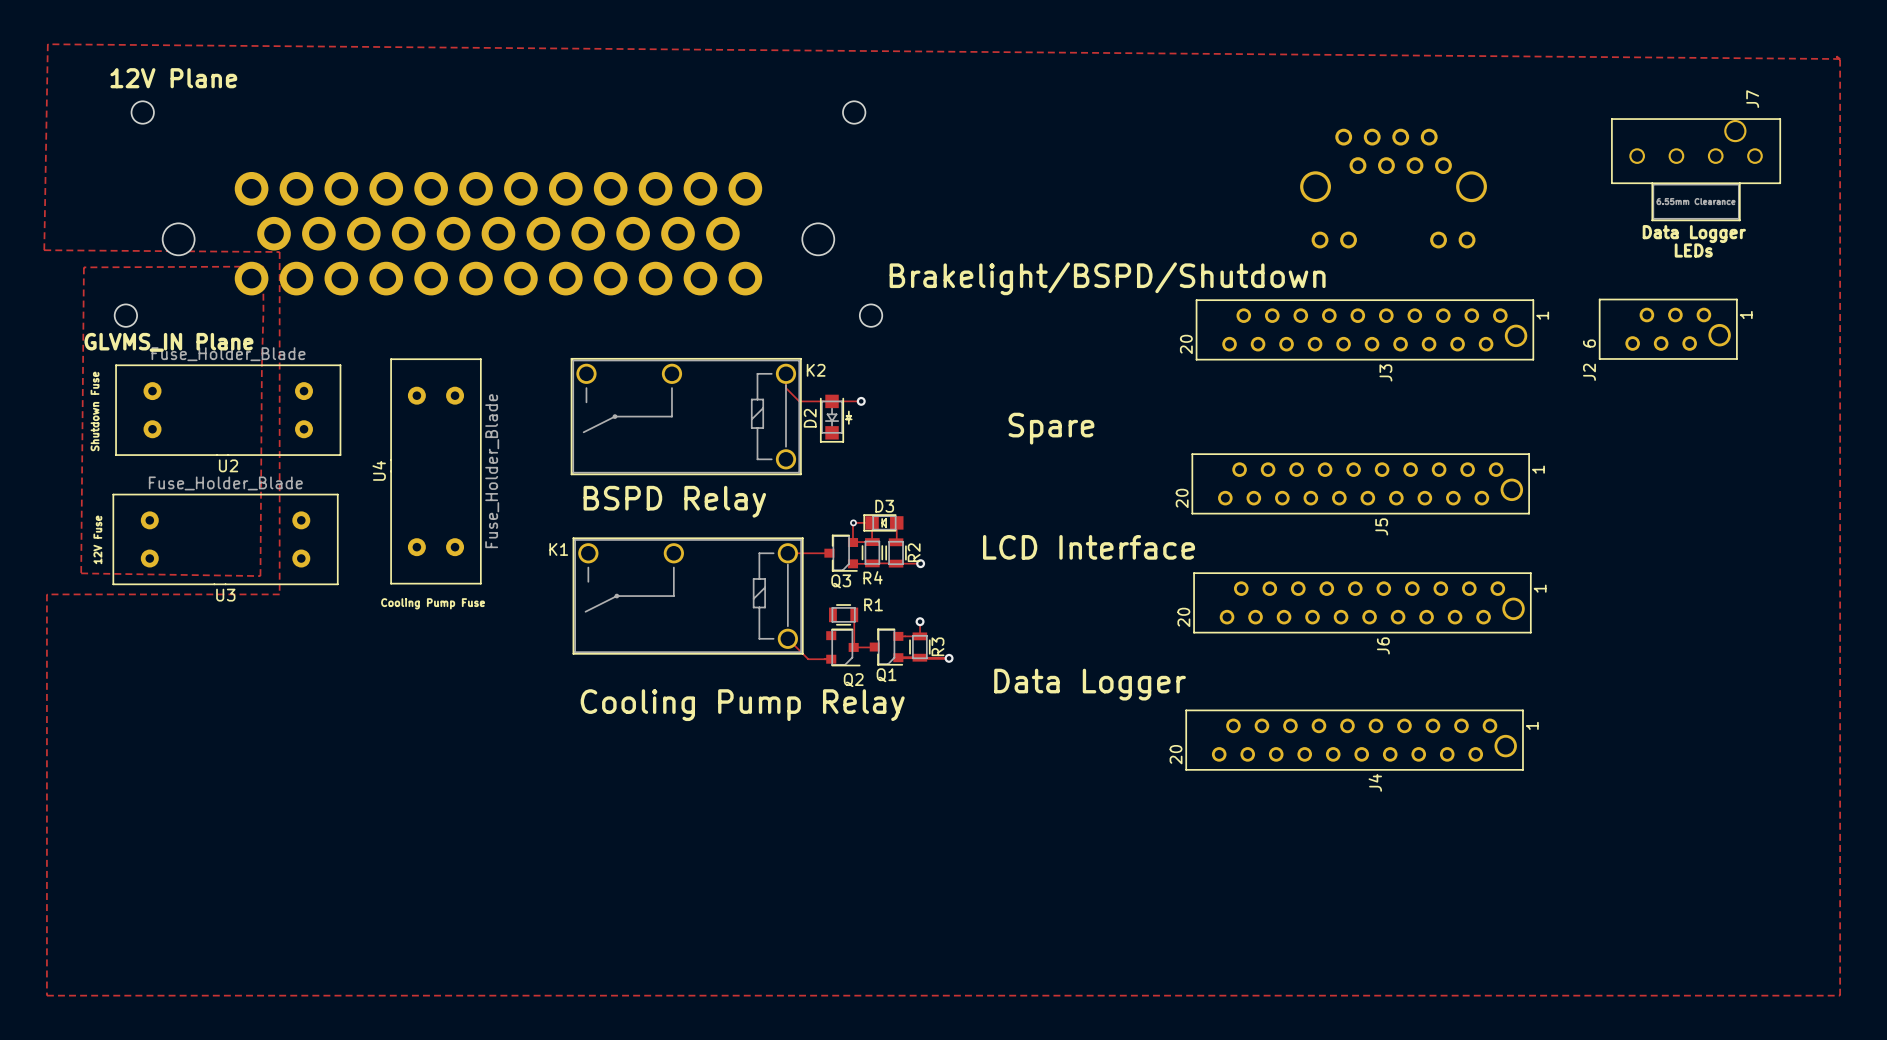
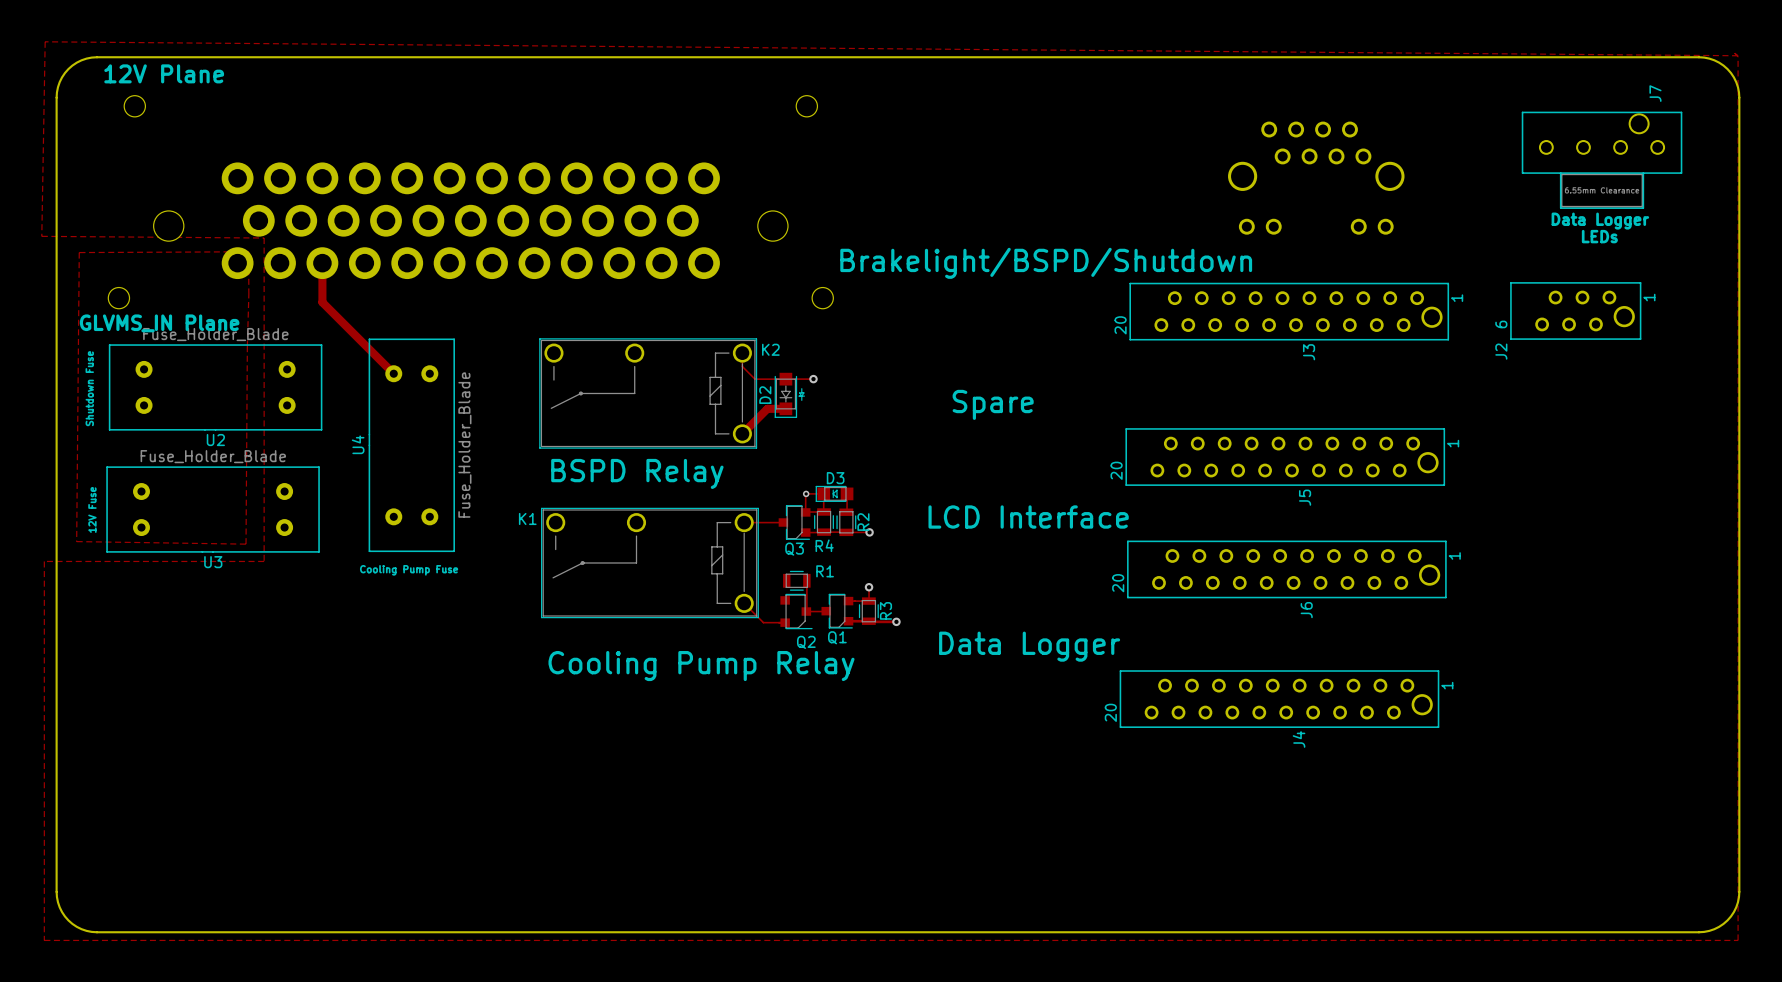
board edge: none -> (97, 57) (1698, 57) (1719, 62) (1733, 77) (1739, 97) (1739, 891) (1733, 912) (1719, 926) (1698, 932) (97, 932) (76, 926) (62, 912) (56, 891) (56, 97) (59, 82) (68, 69) (81, 60) (97, 57)
track: none -> (322, 263) (322, 302) (393, 373)
track: none -> (785, 408) (767, 408) (742, 433)

